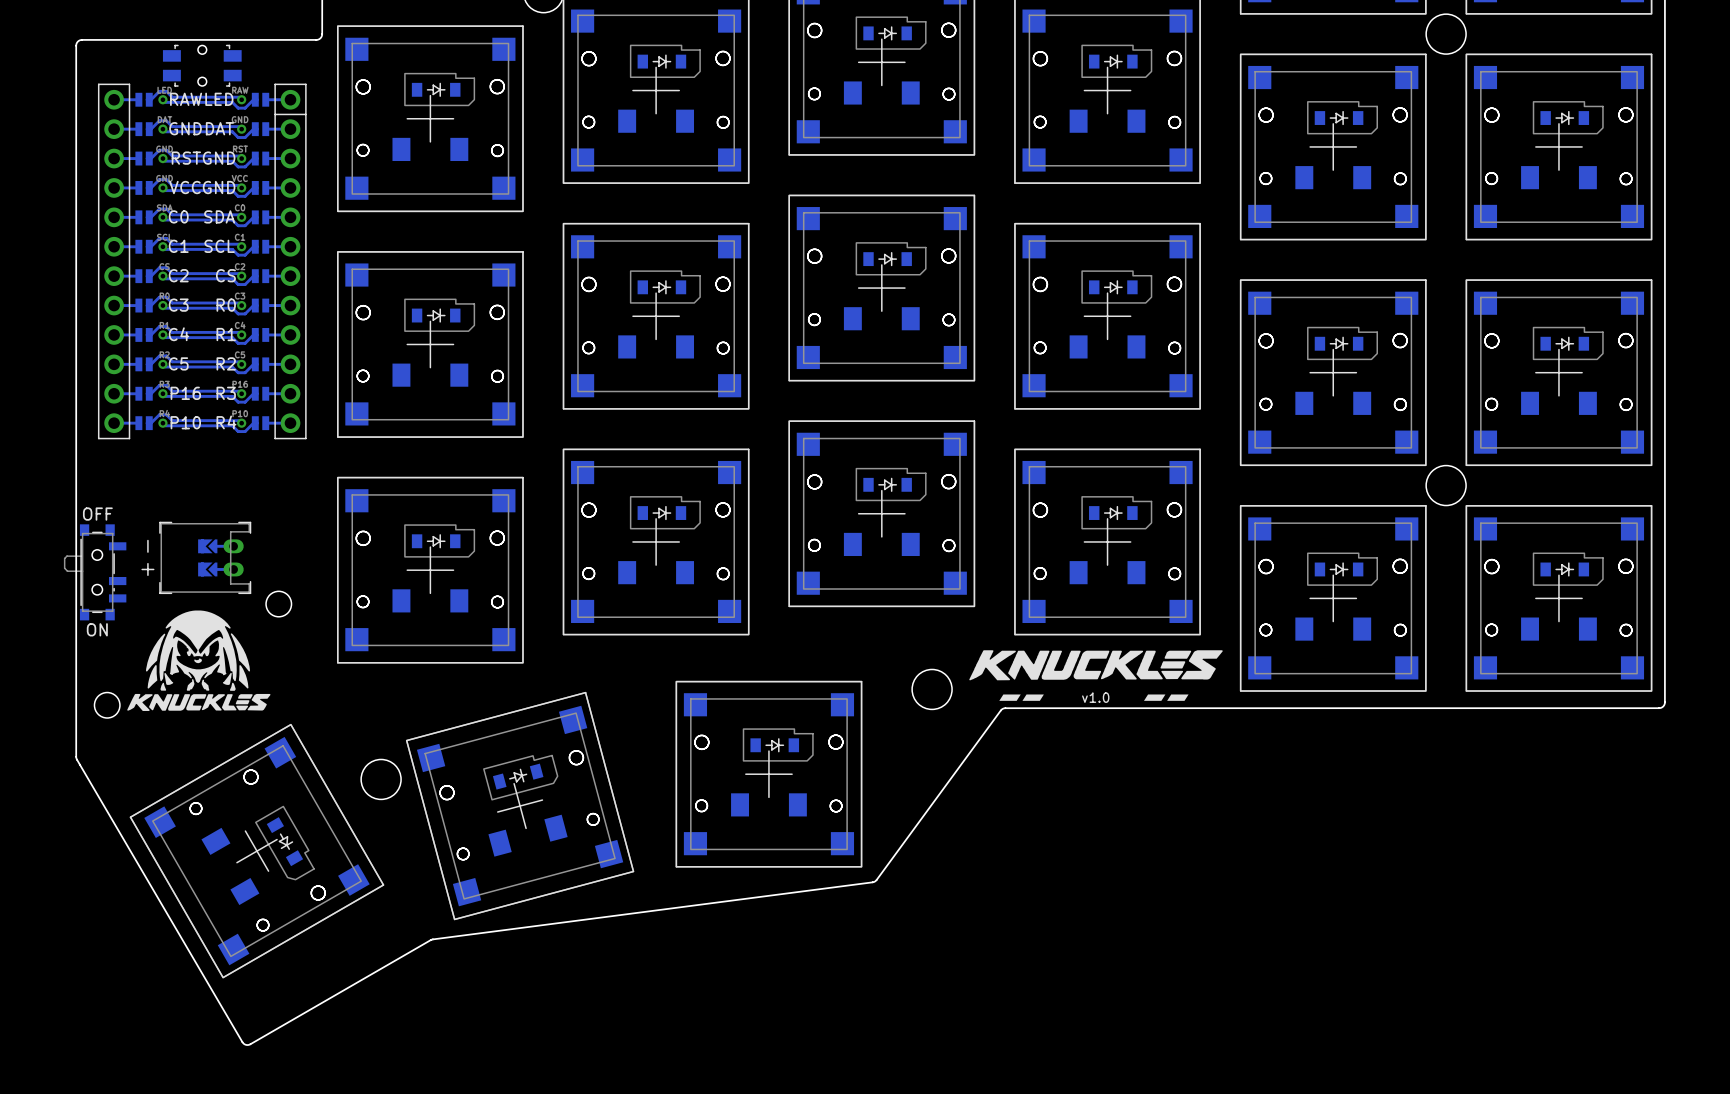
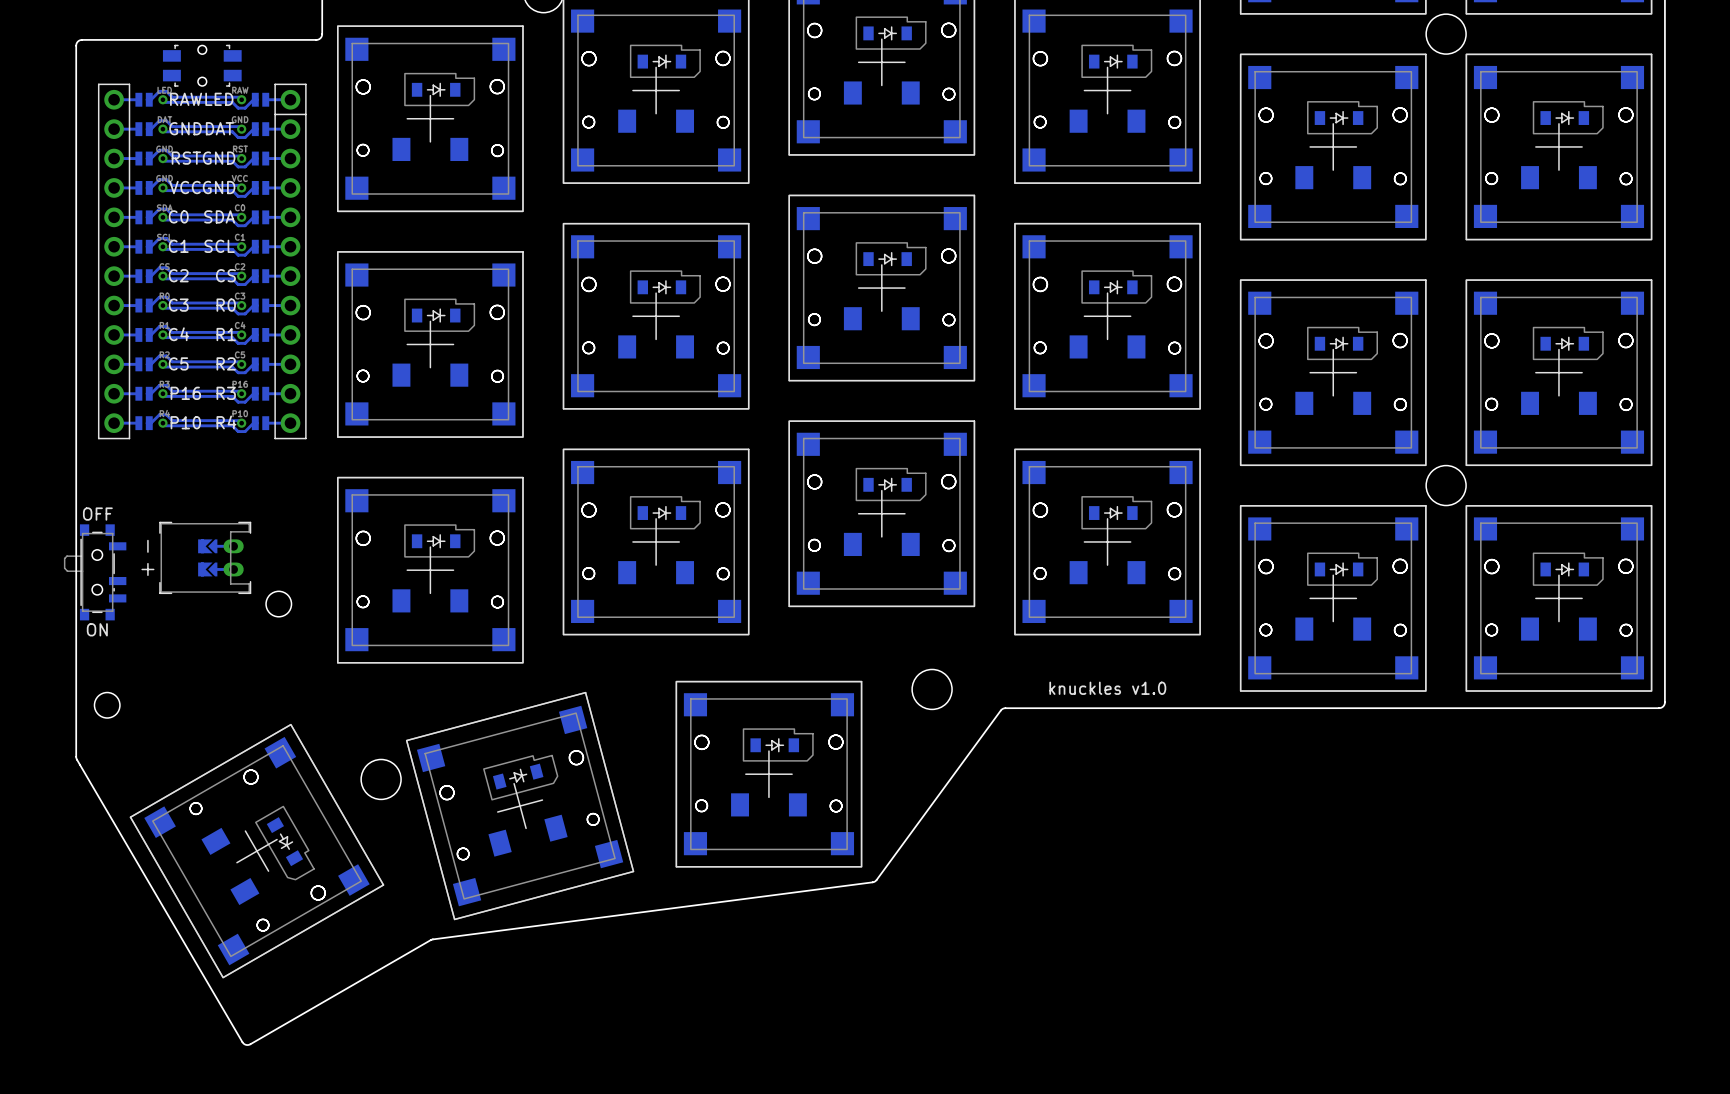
drawing: [127, 610, 271, 711] -> none
drawing: [969, 650, 1223, 701] -> none
text: none -> knuckles v1.0 (1107, 688)
text: v1.0 (1095, 697) -> none

